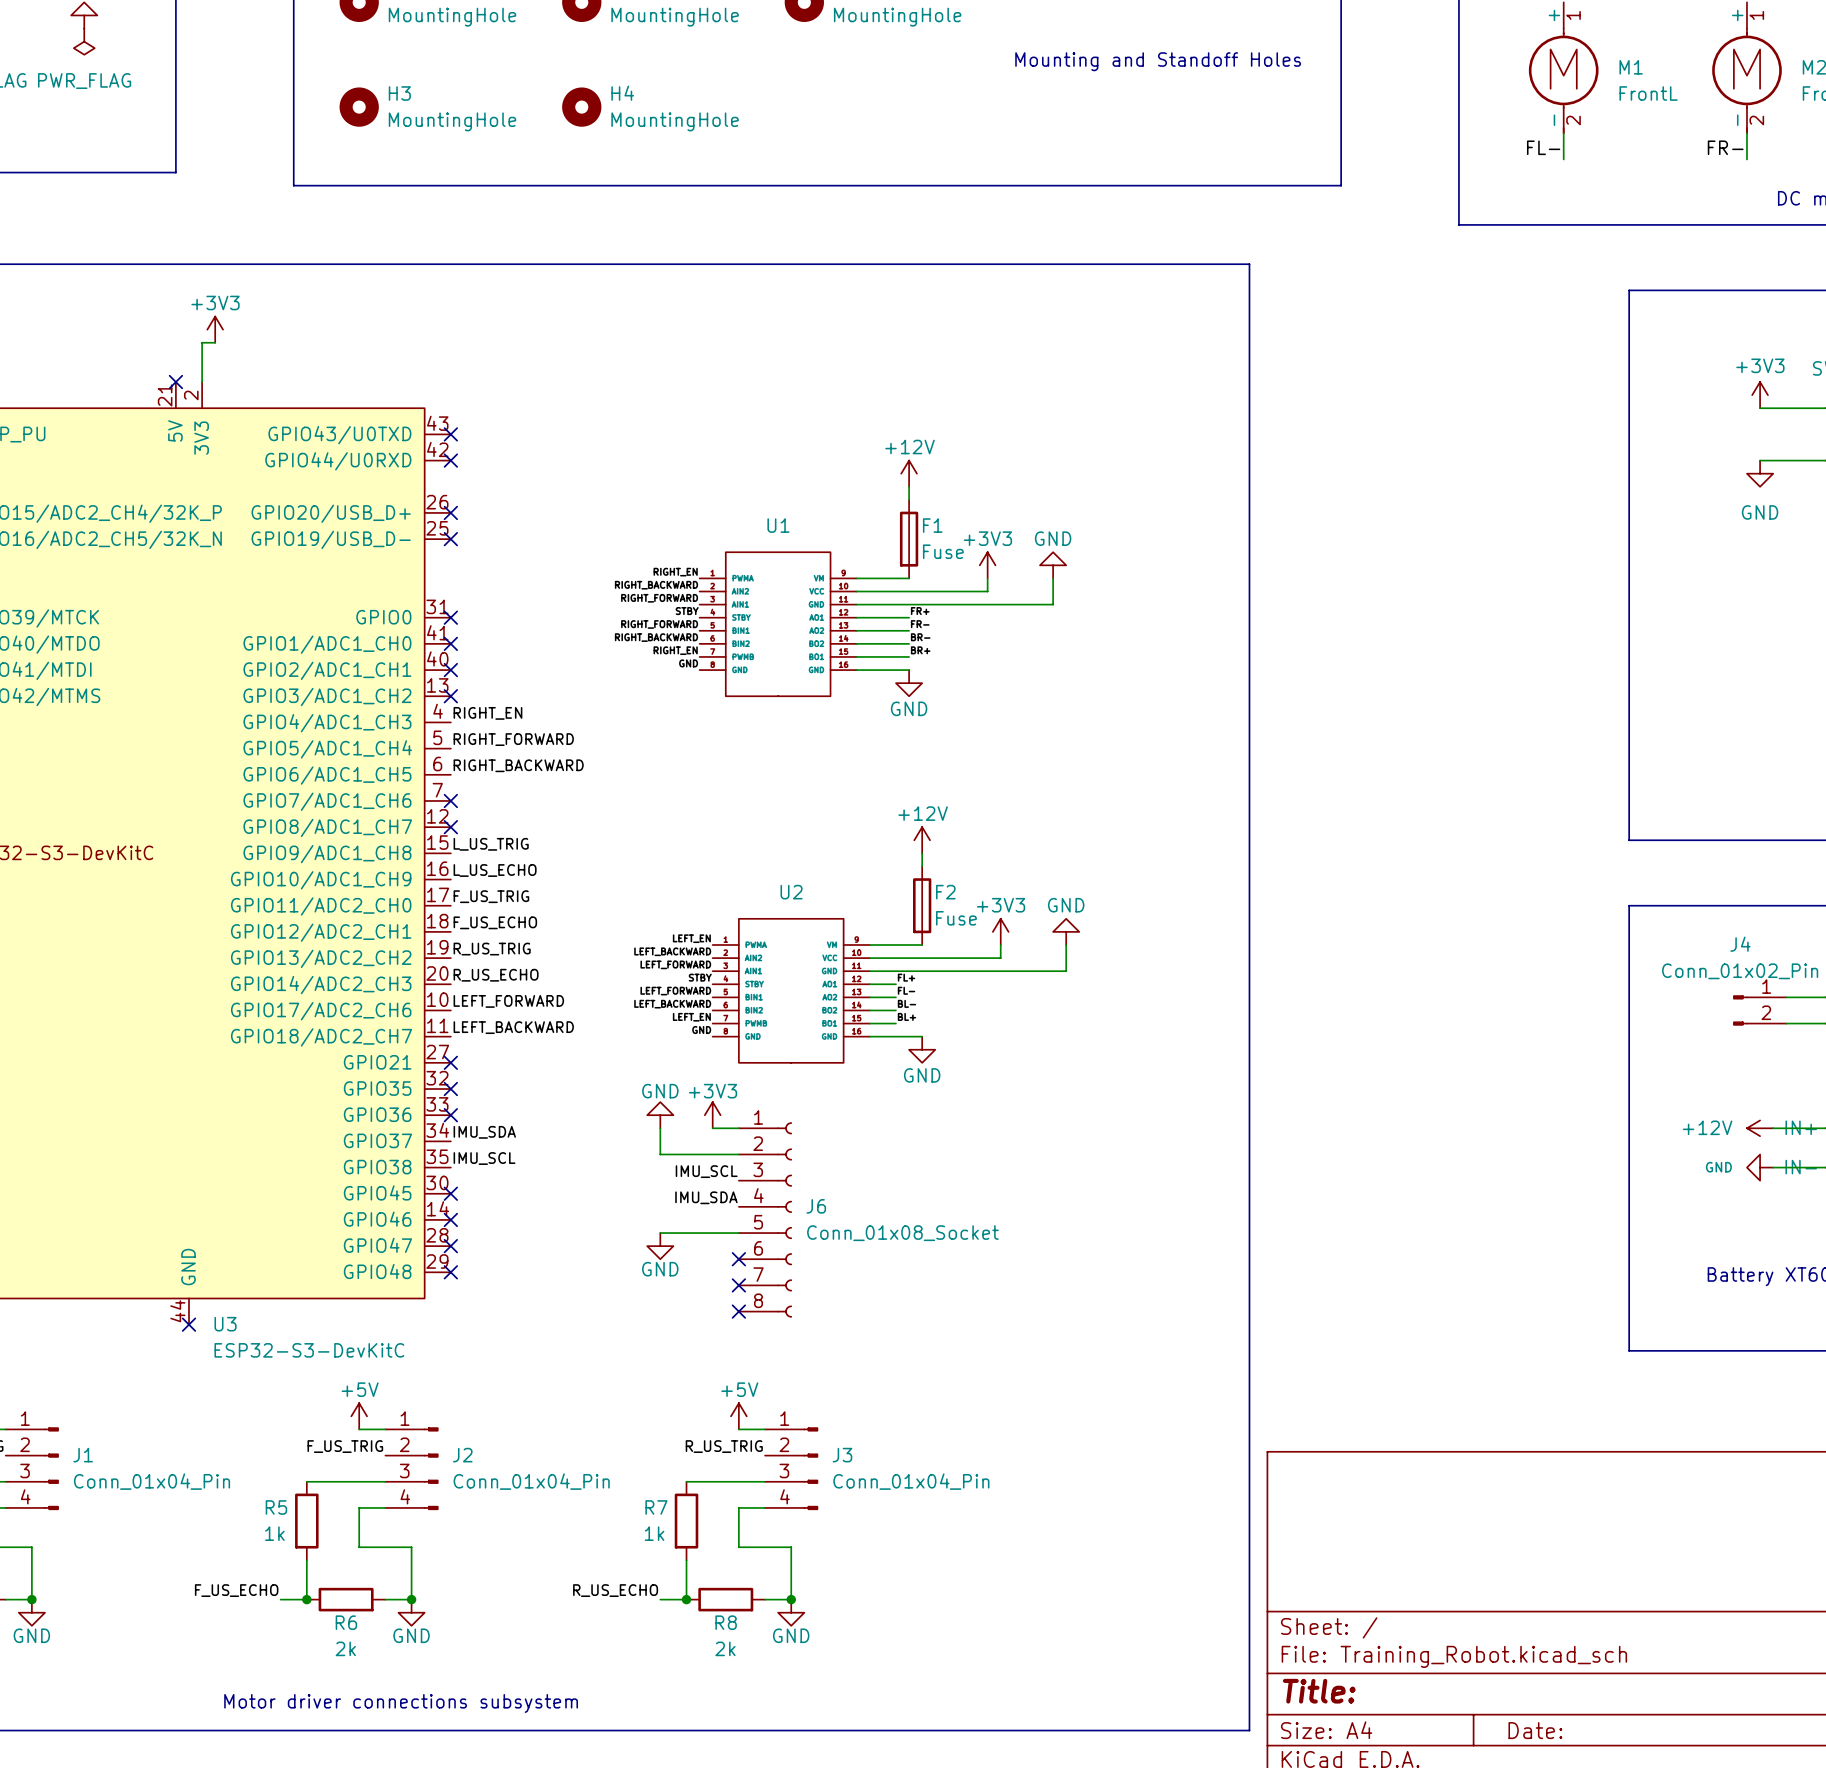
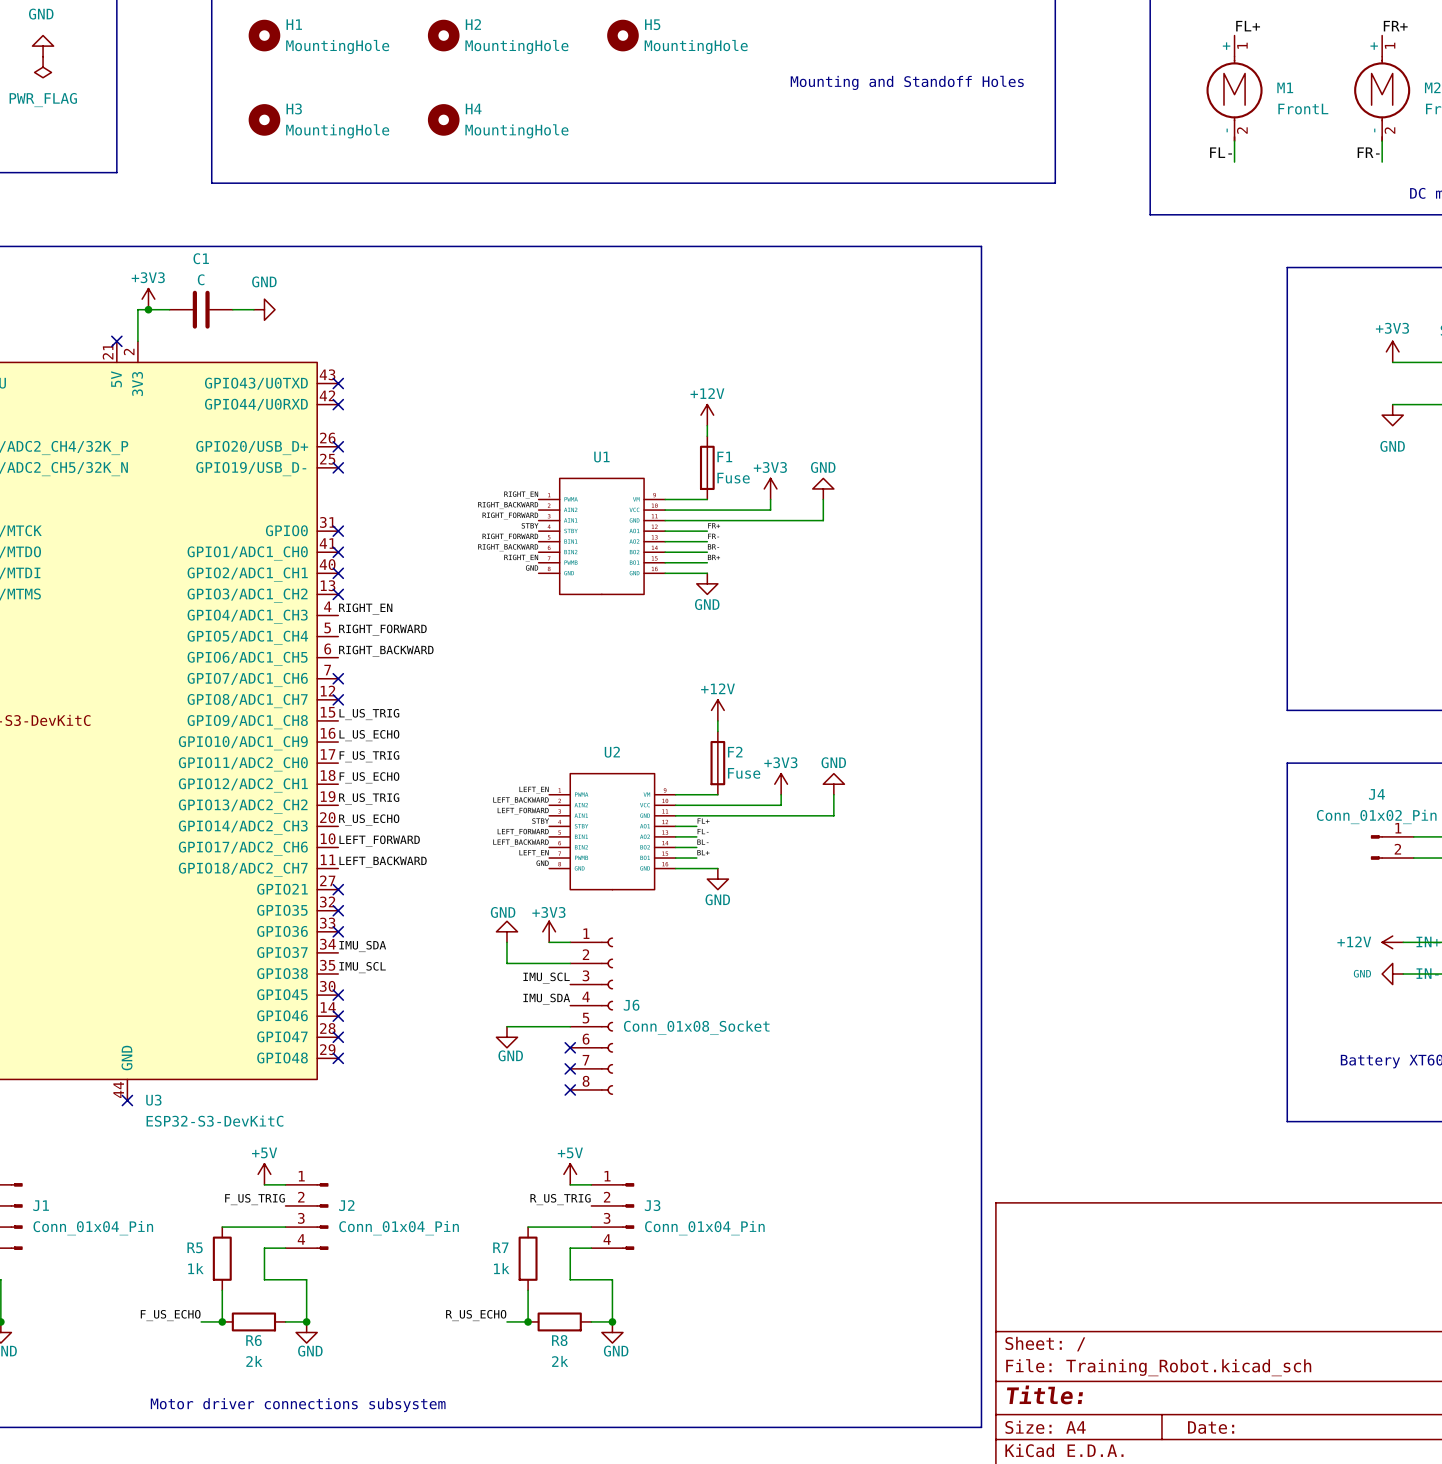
wire: none -> (148, 309) (169, 309)
junction: none -> (148, 309)
C1: none -> C (201, 309)
wire: none -> (232, 309) (253, 309)
power symbol: none -> GND (264, 309)

